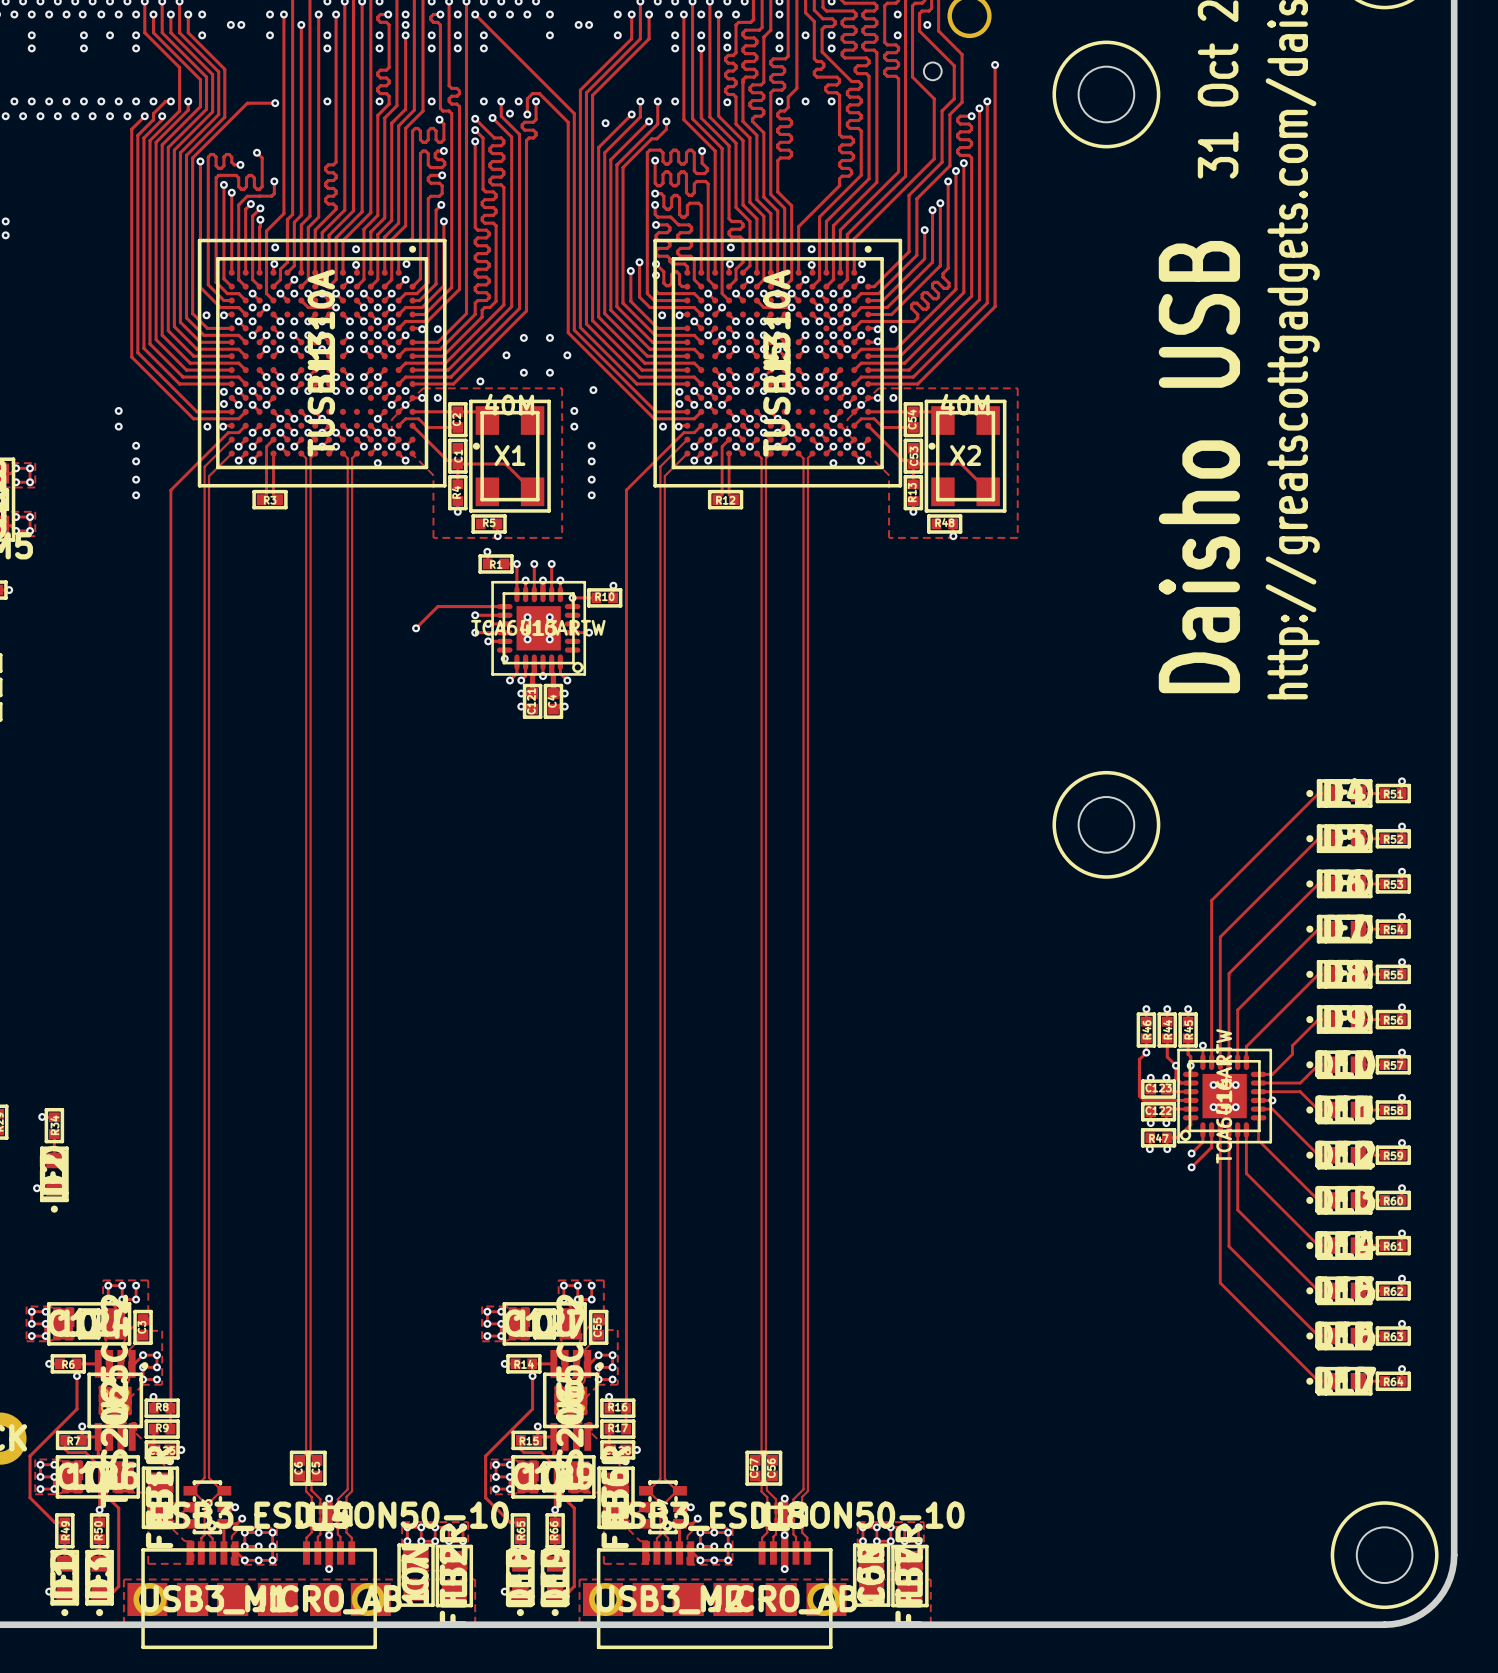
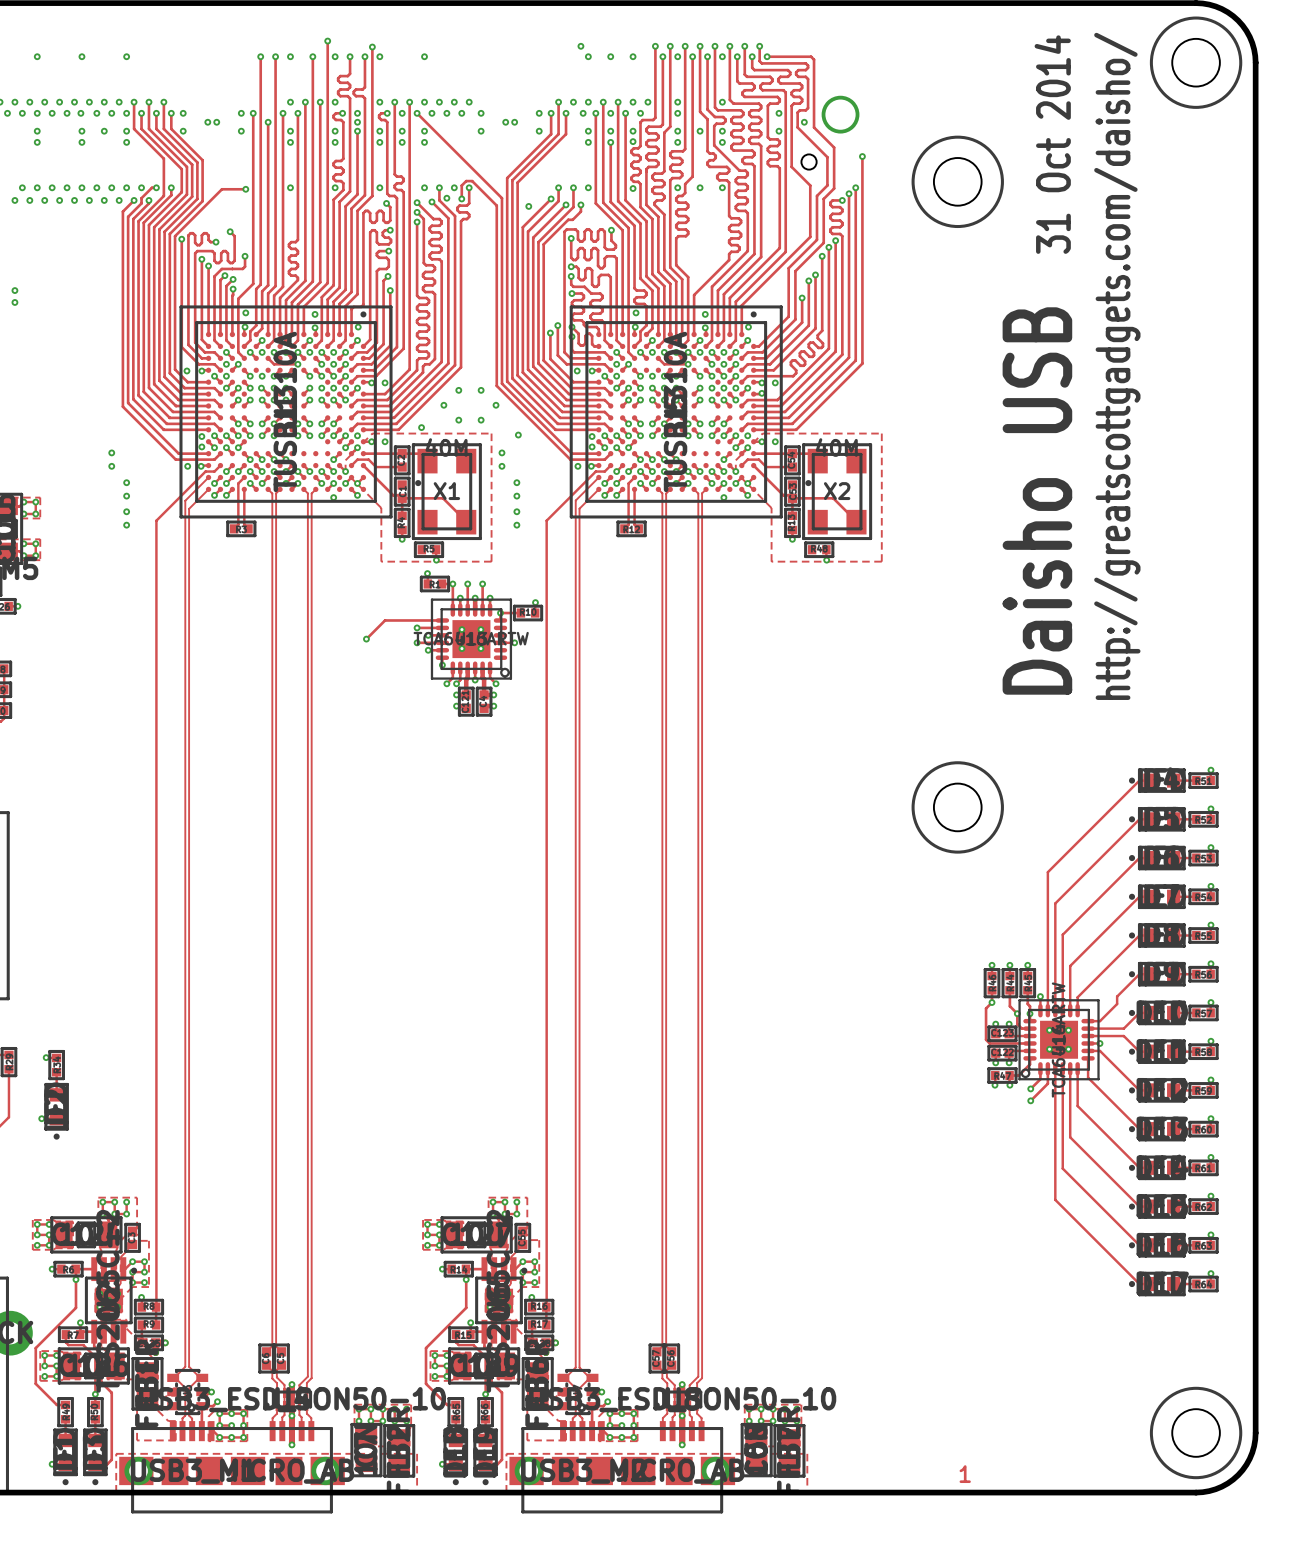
text: none -> 1 (965, 1474)

